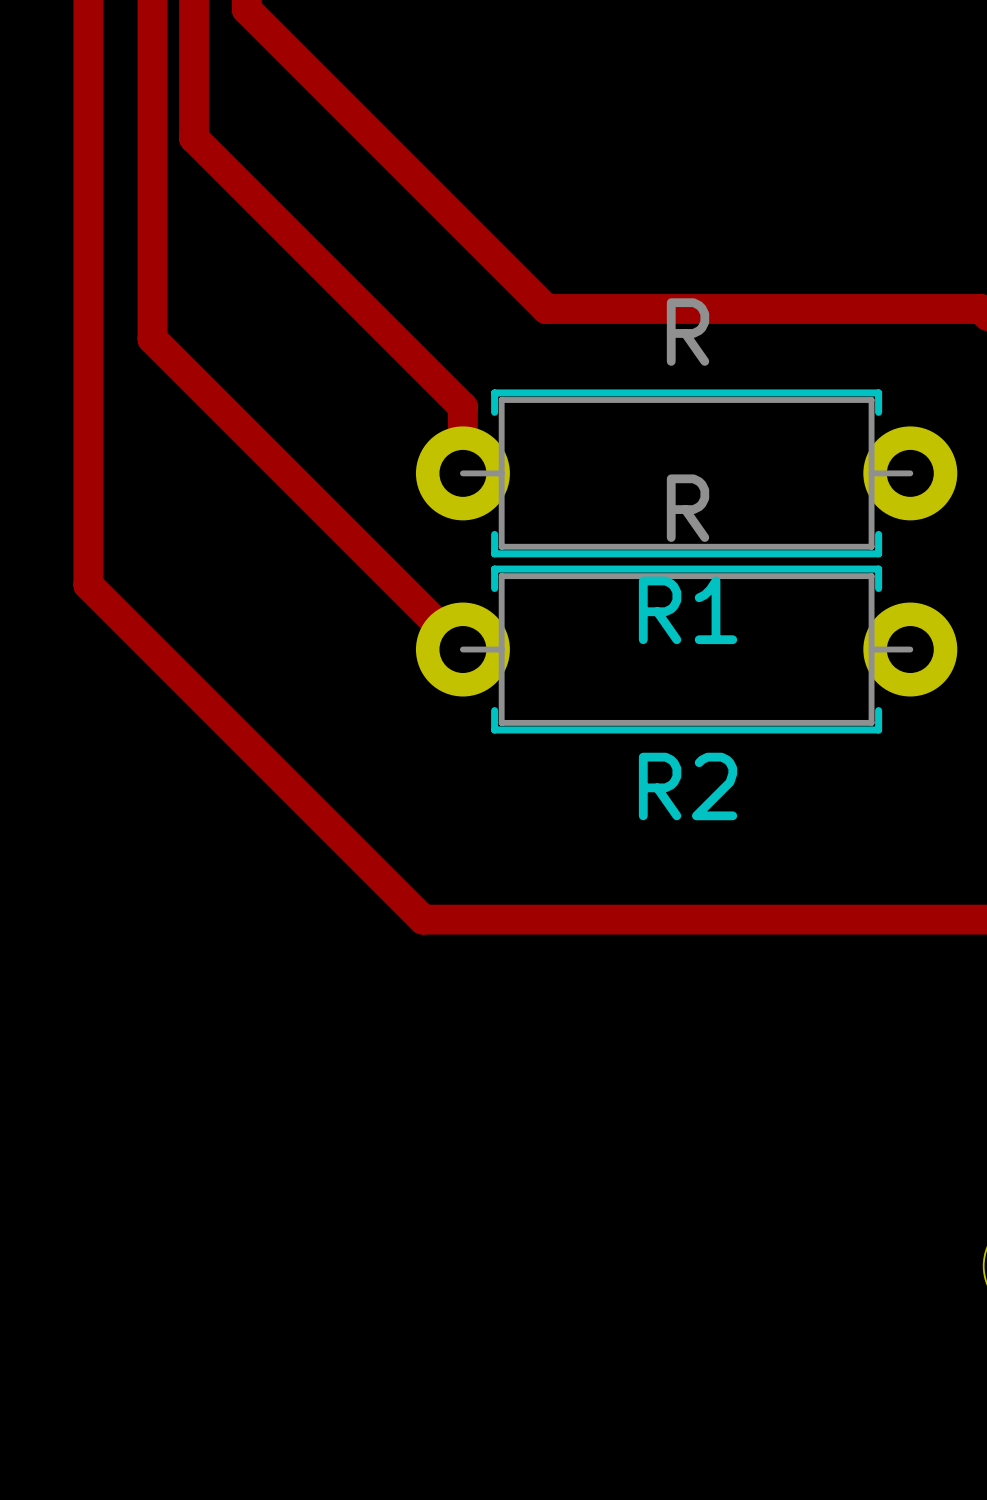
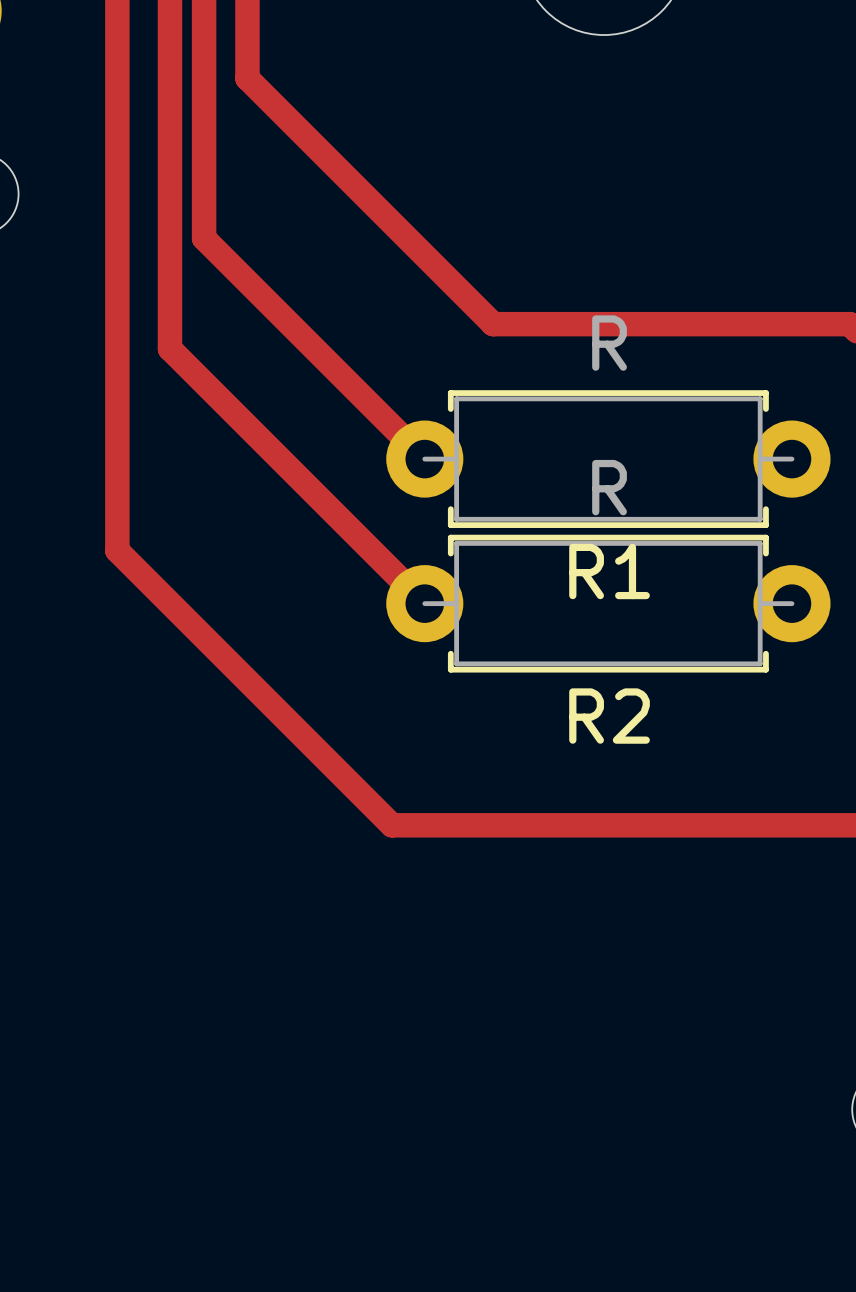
track: (194, 138) (462, 406) (462, 473) -> (204, 183) (204, 238) (424, 459)

